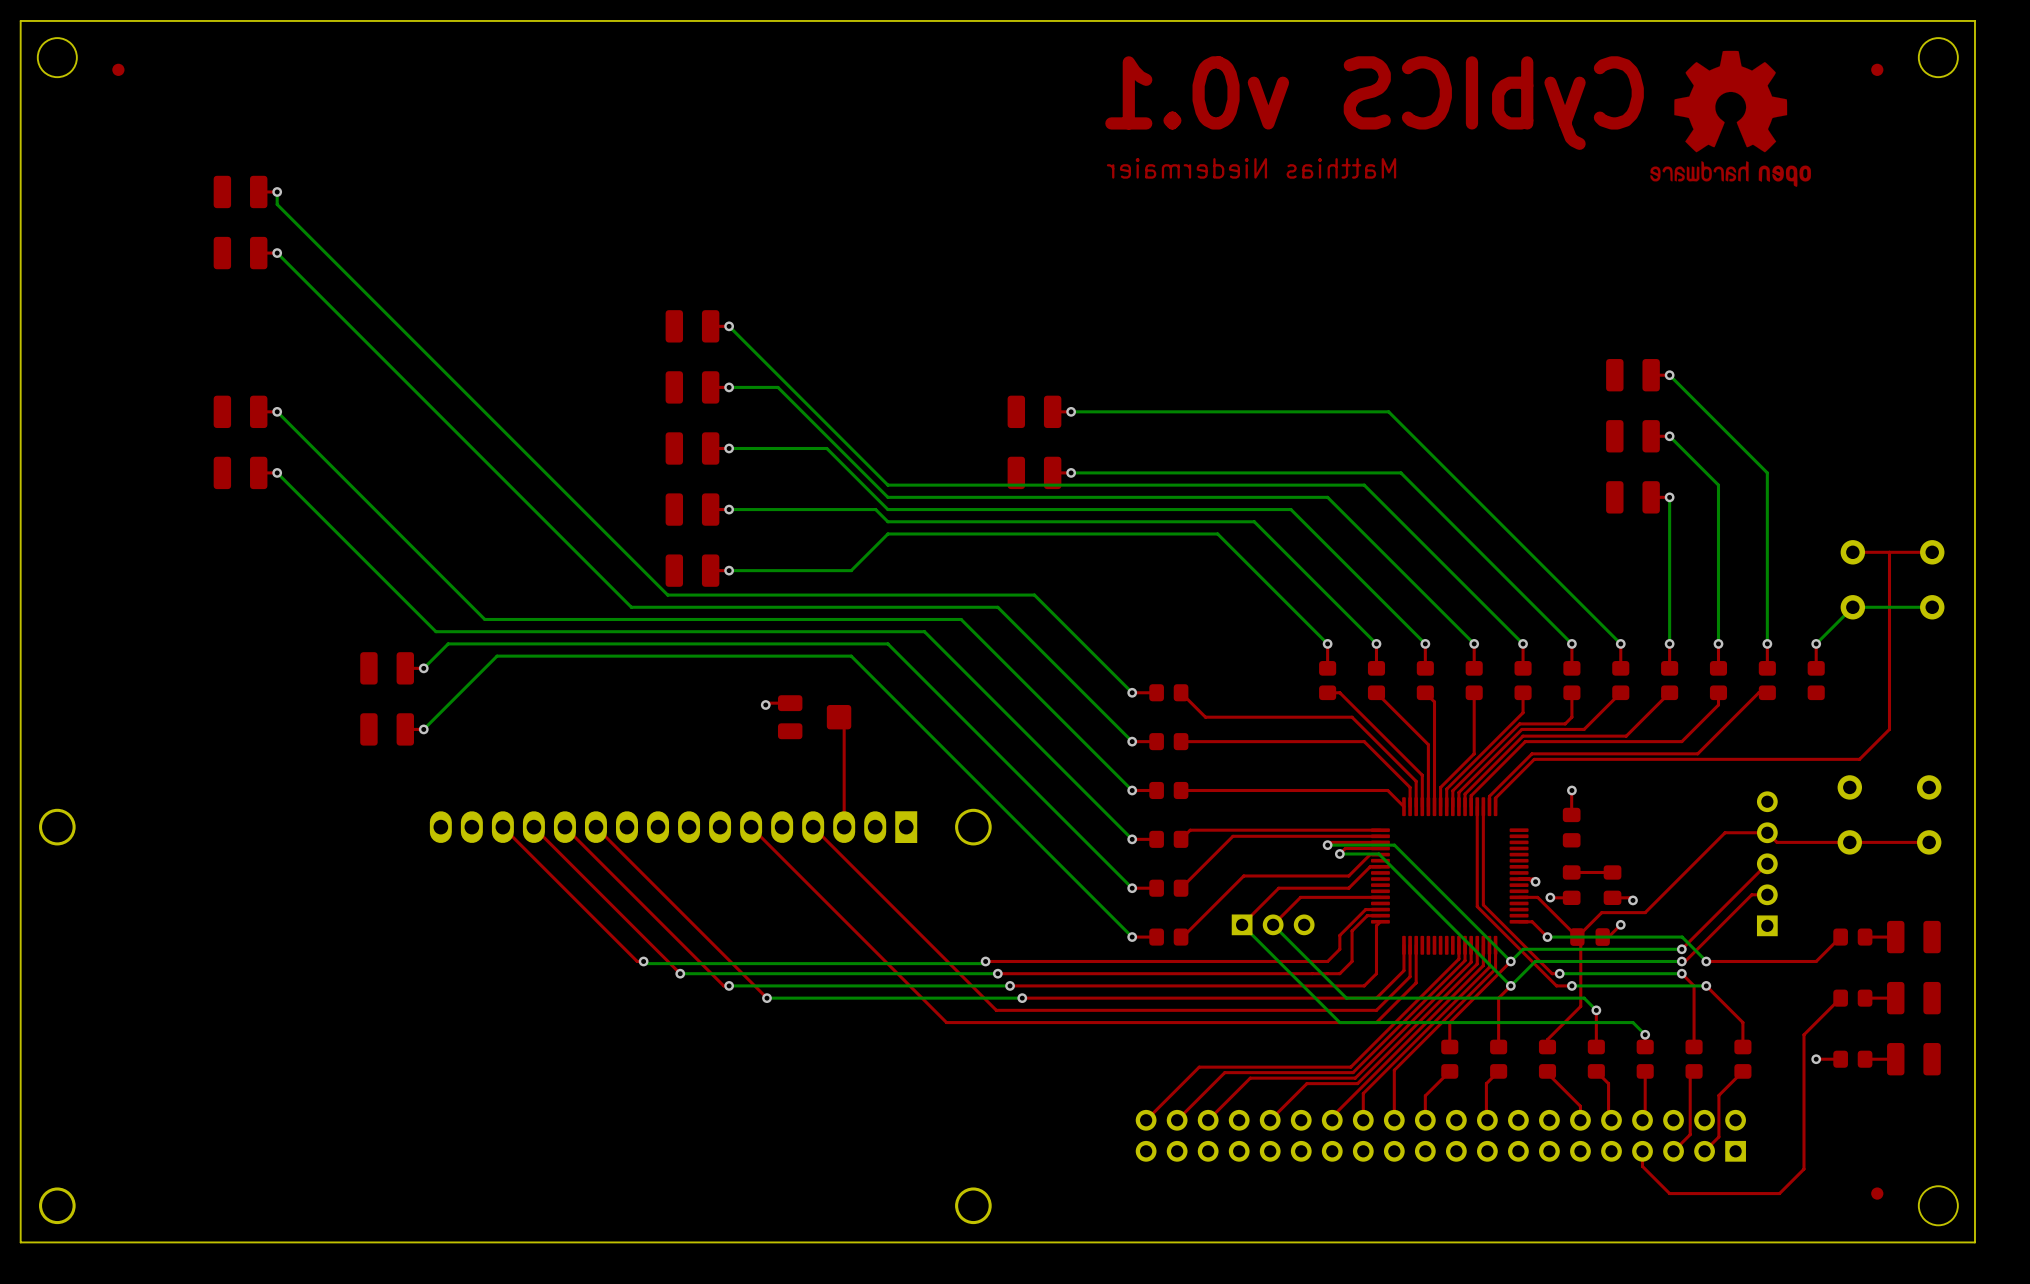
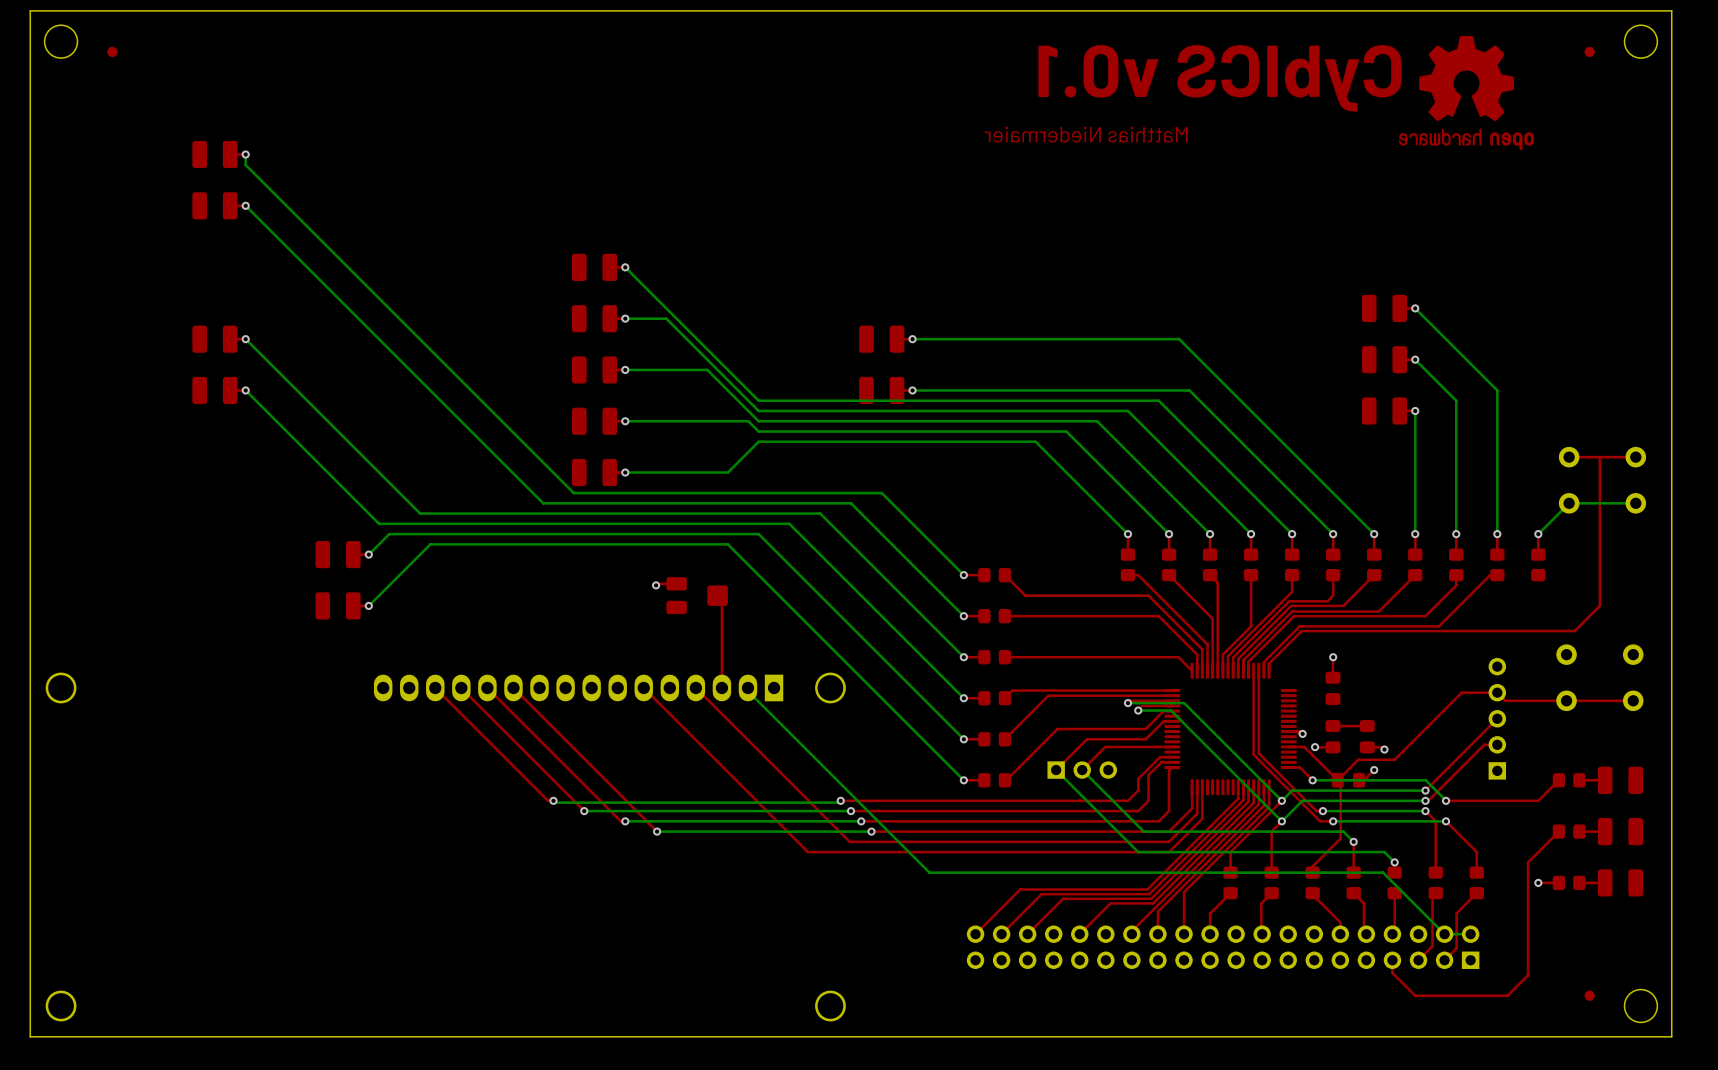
bottom track: none -> (747, 687) (747, 691) (929, 872) (1383, 872) (1444, 934) (1470, 934)

